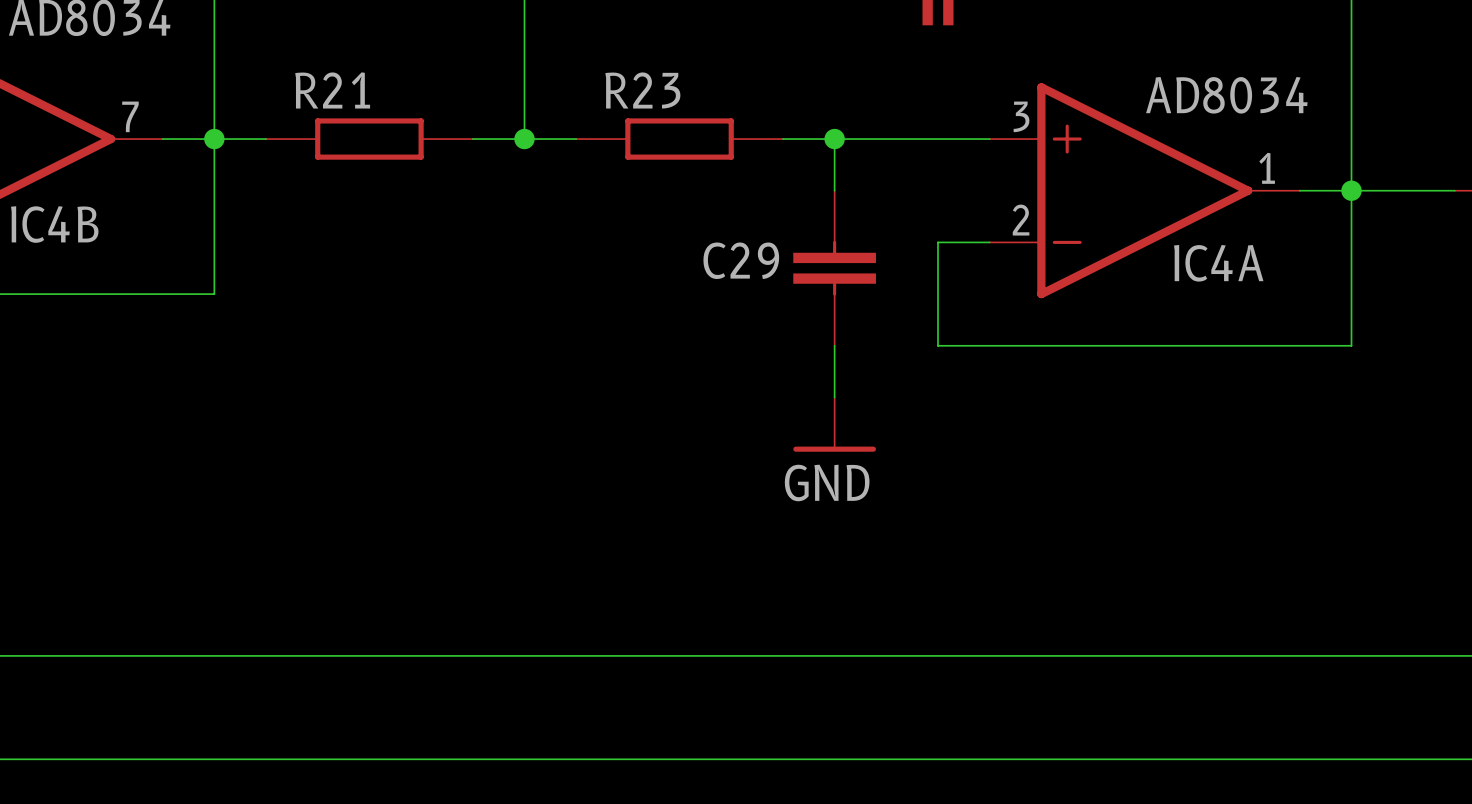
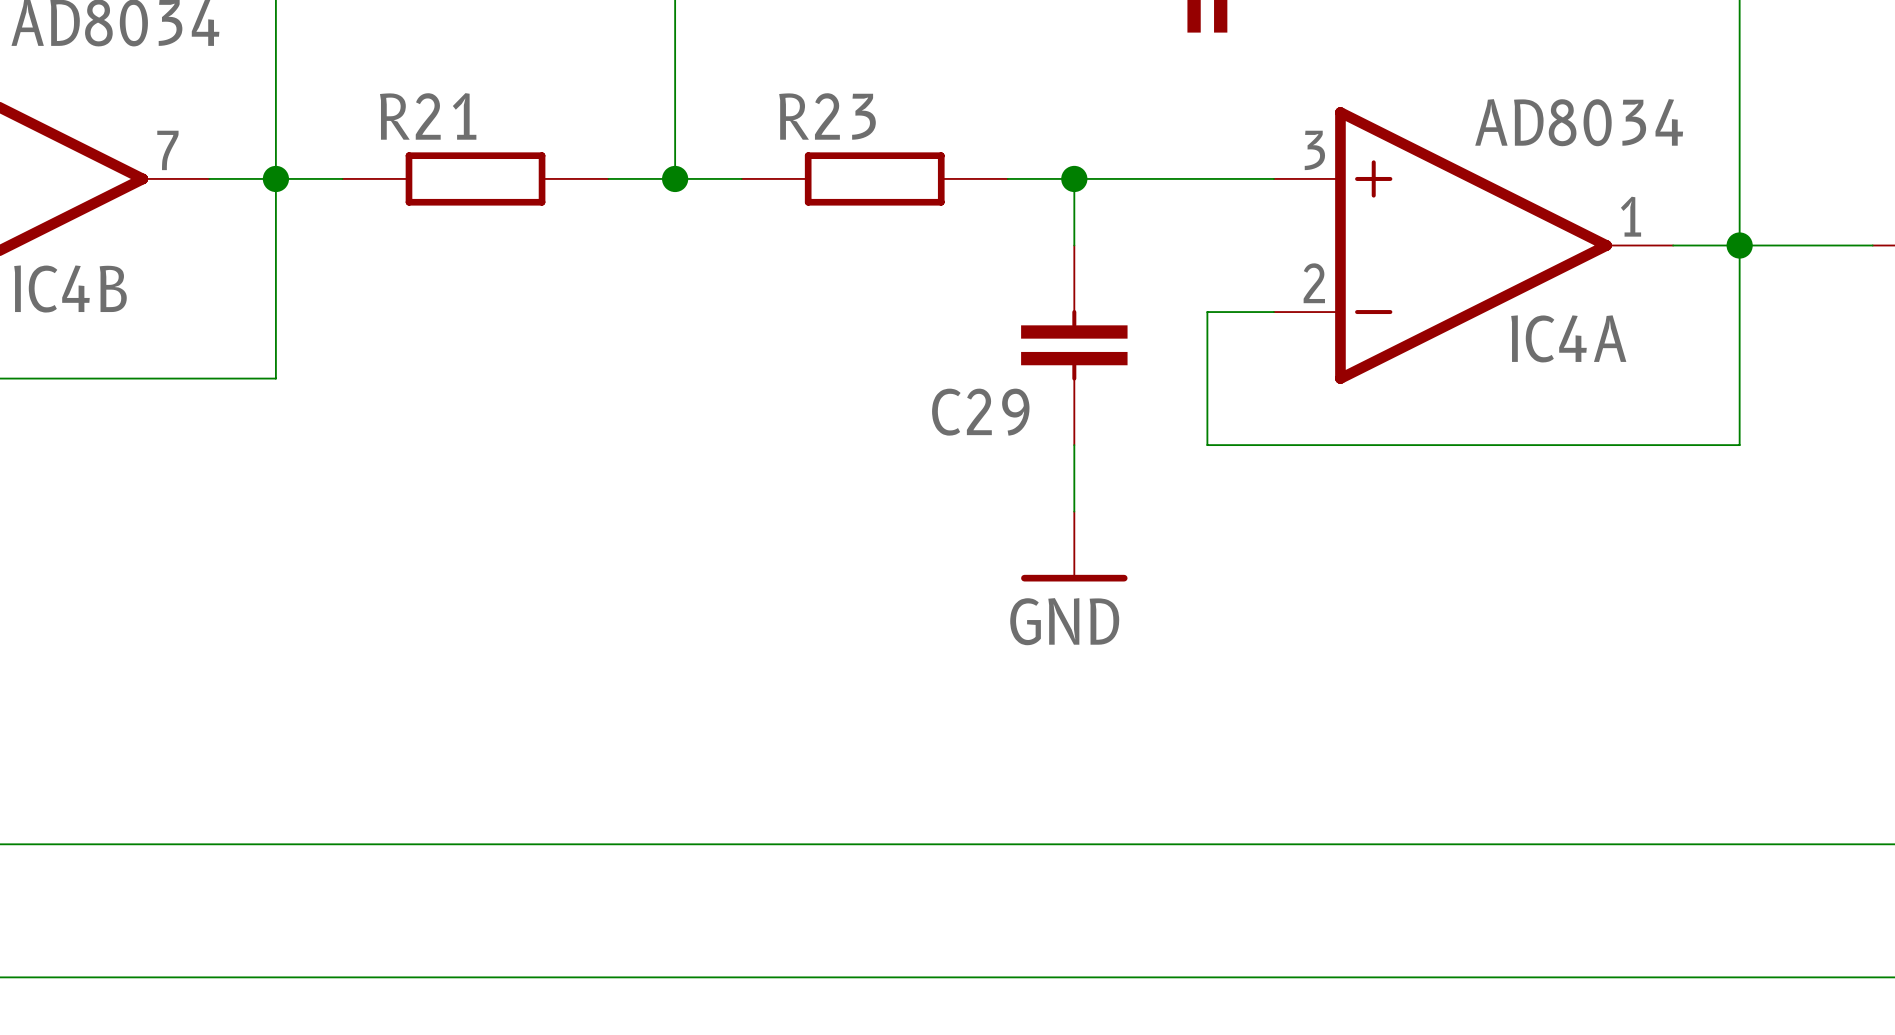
C29 name position: C29 (741, 260) -> C29 (980, 412)

